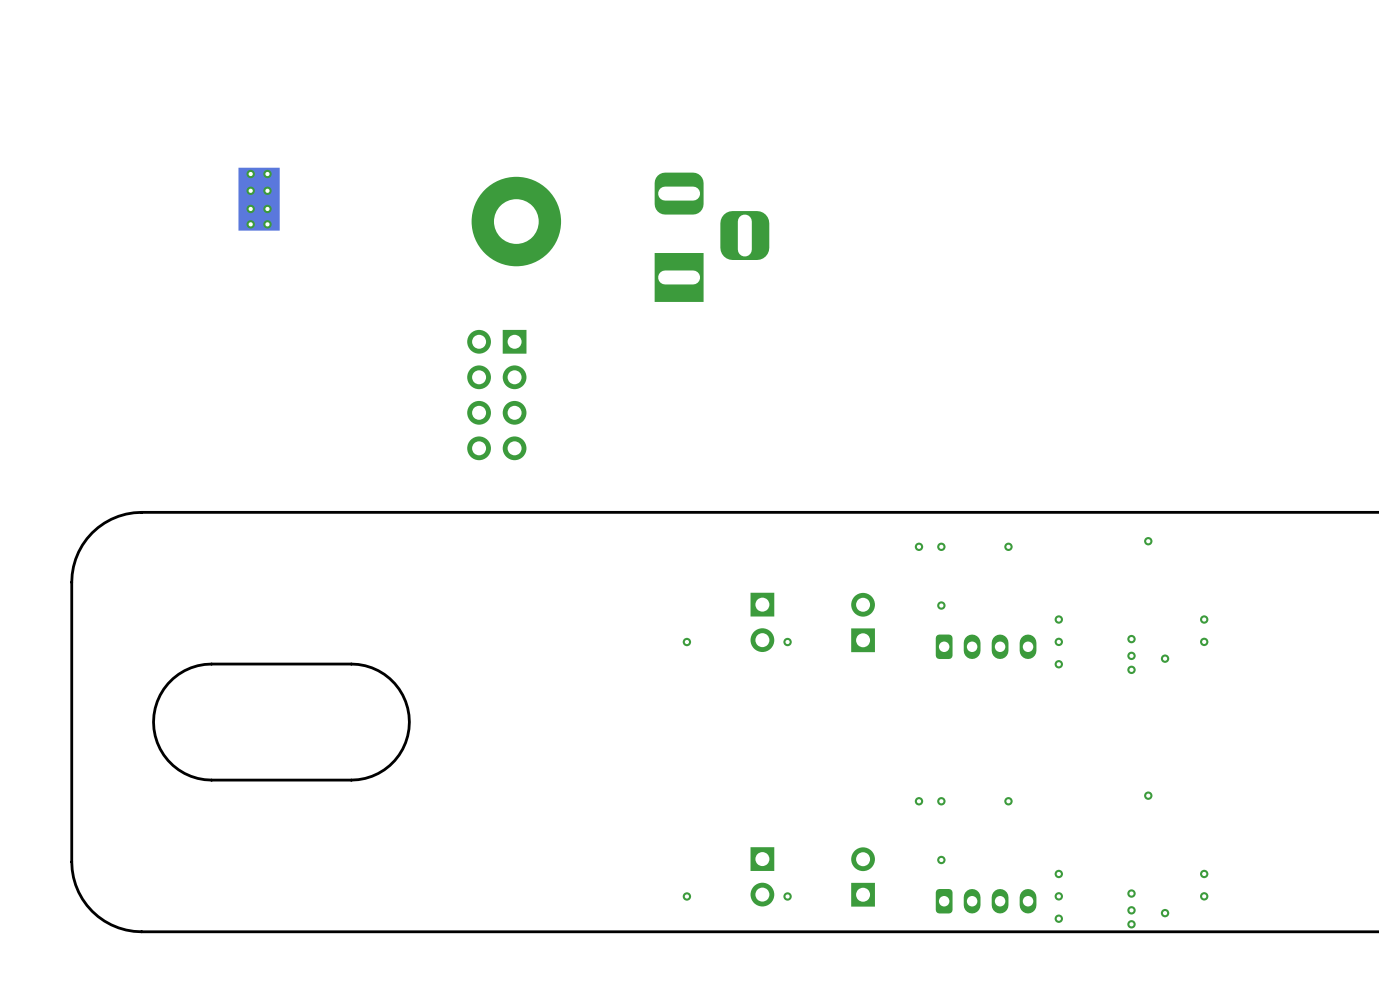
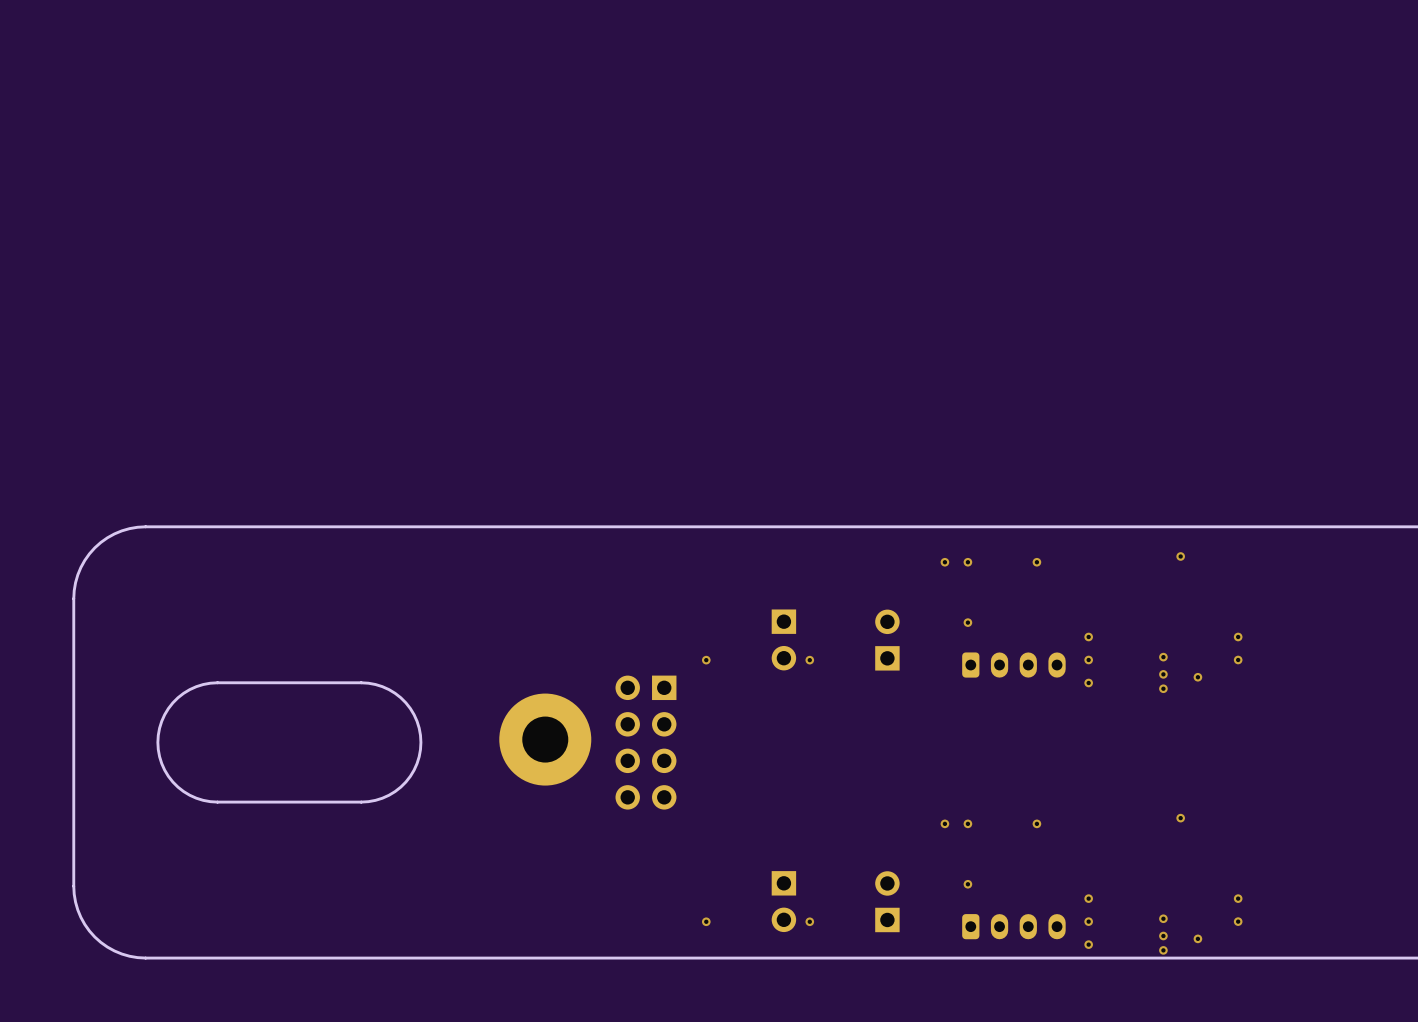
part: (259, 199) -> none
part: (516, 221) -> none
part: (711, 237) -> none
part: (496, 395) -> none
part: none -> (545, 739)
part: none -> (645, 742)

